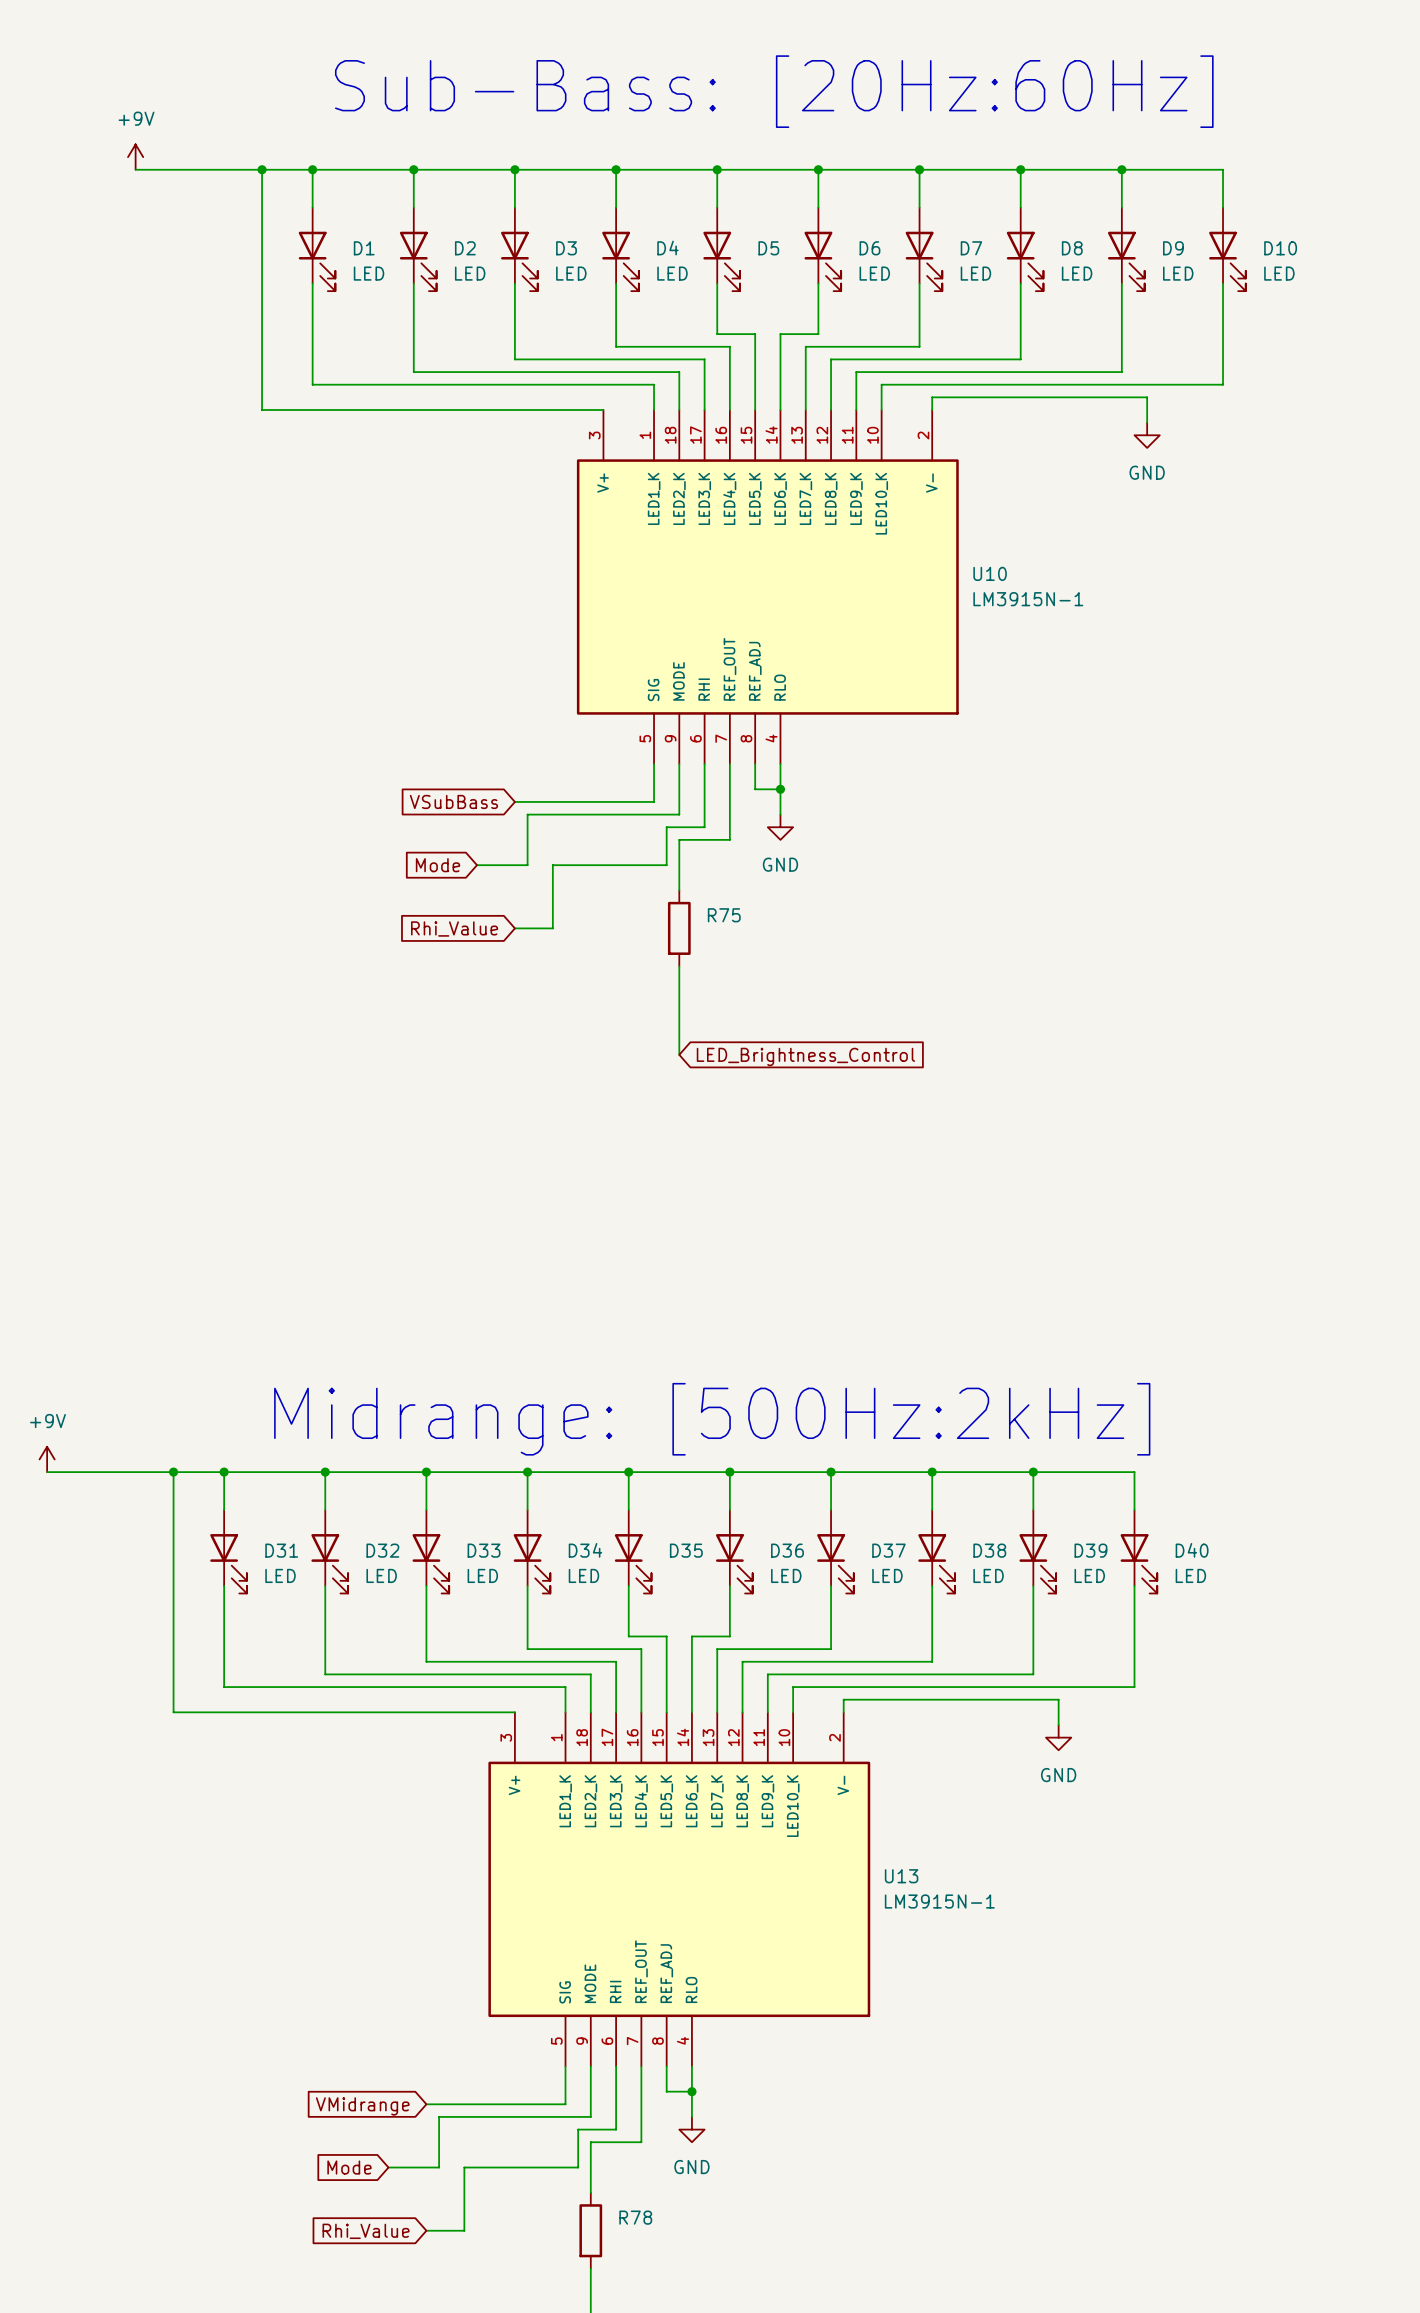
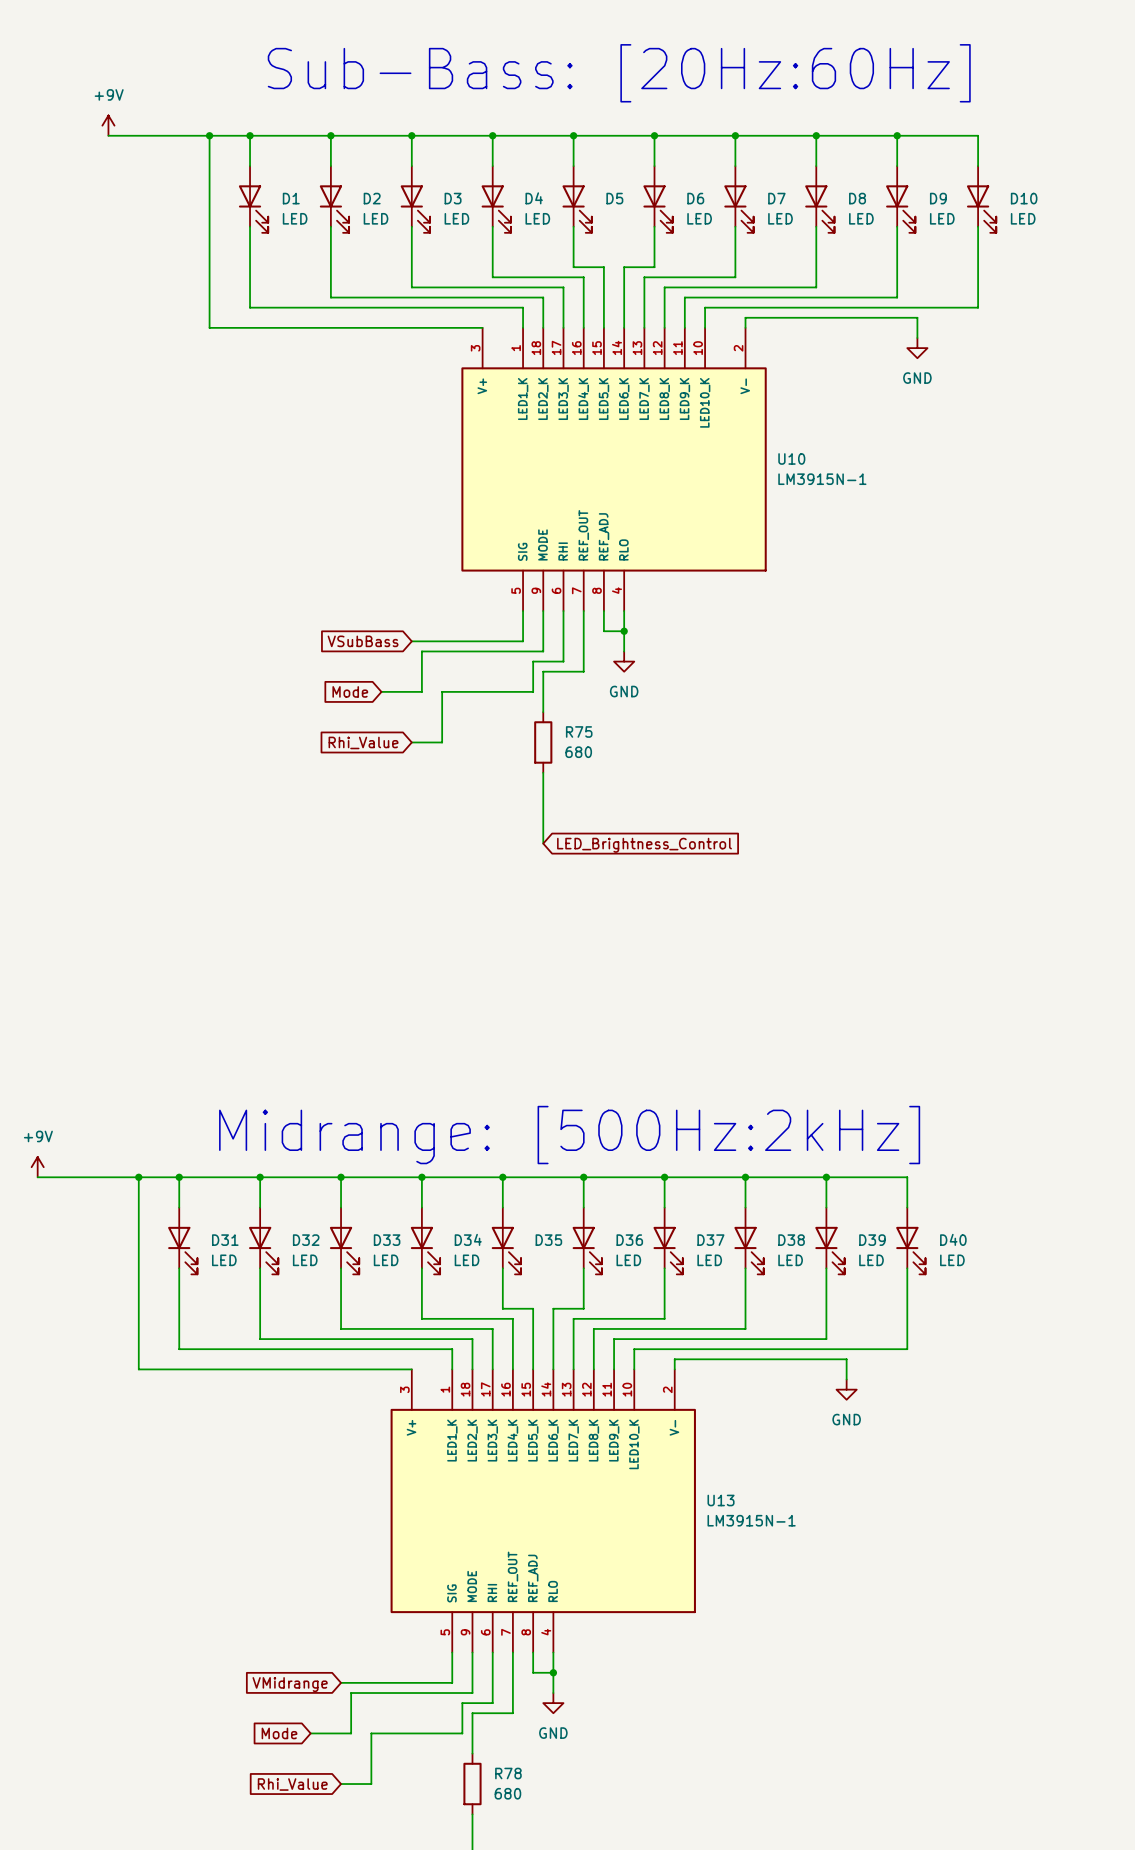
R75 value: none -> 680 (578, 752)
R78 value: none -> 680 (507, 1793)

